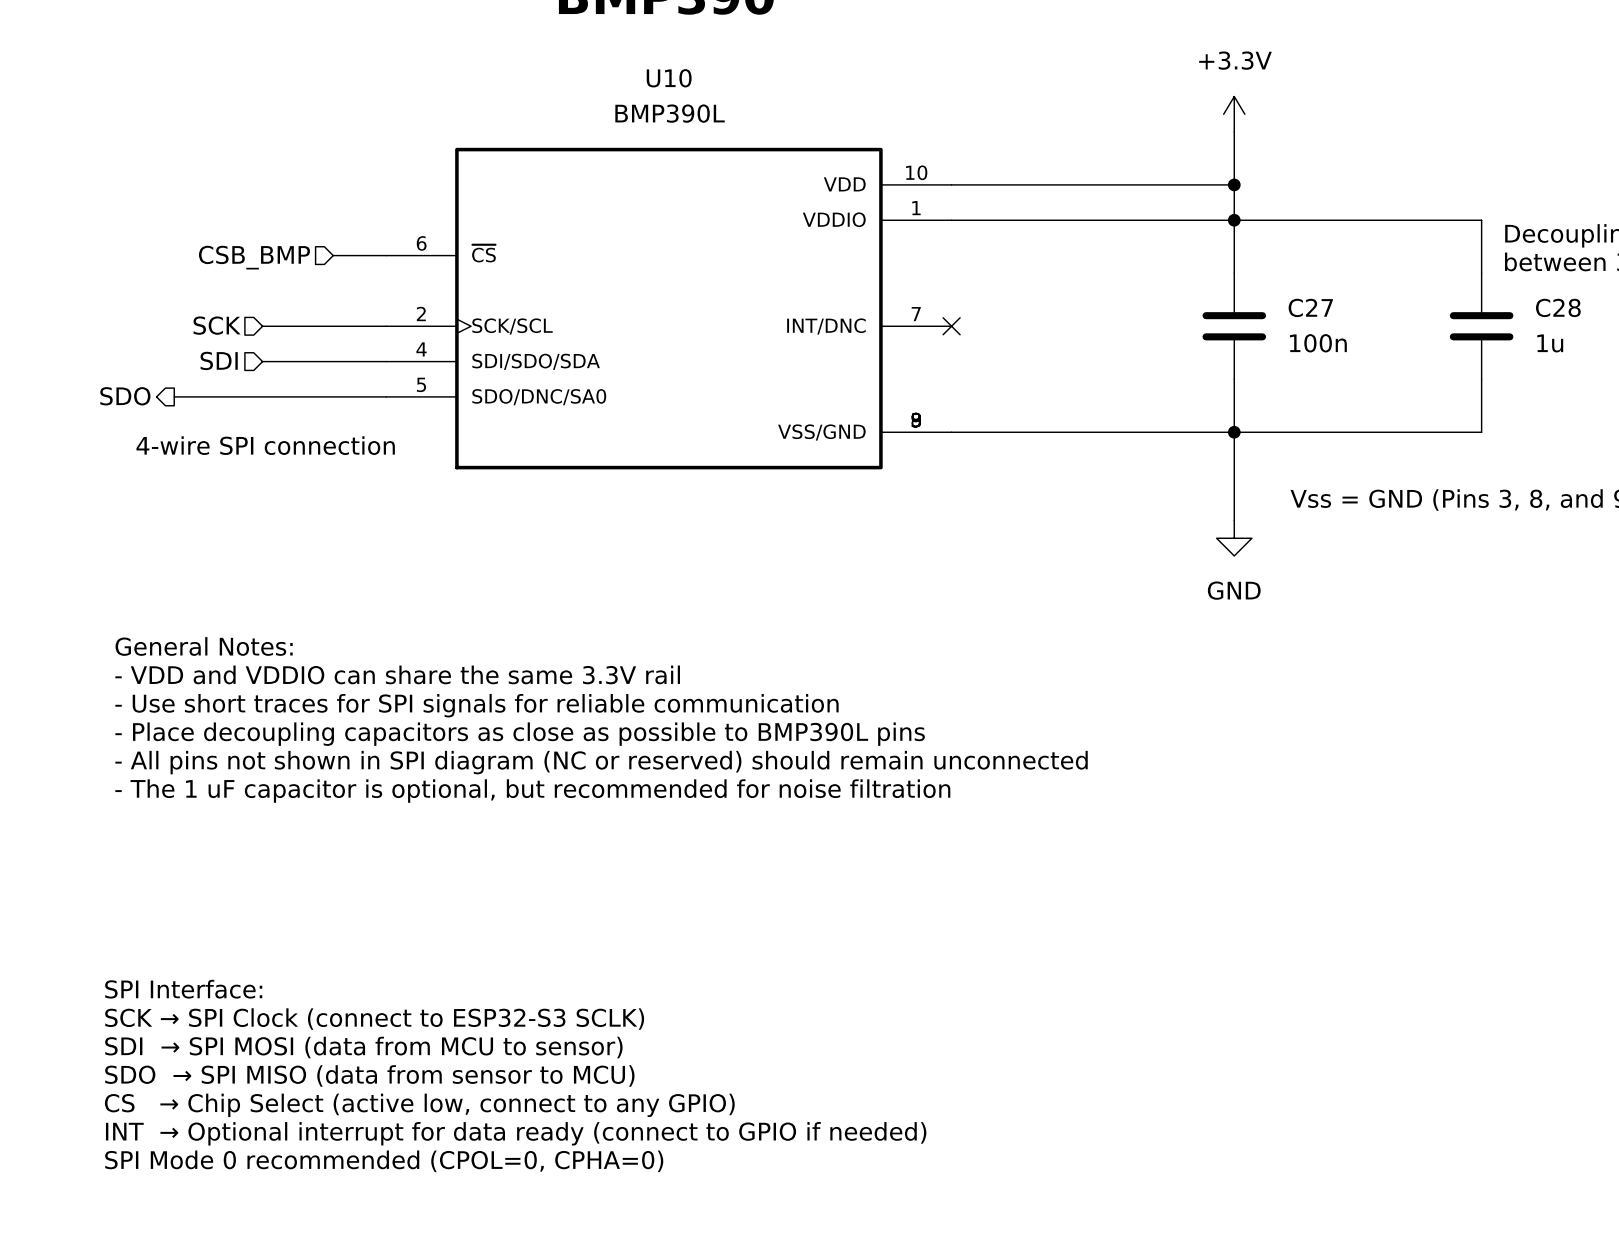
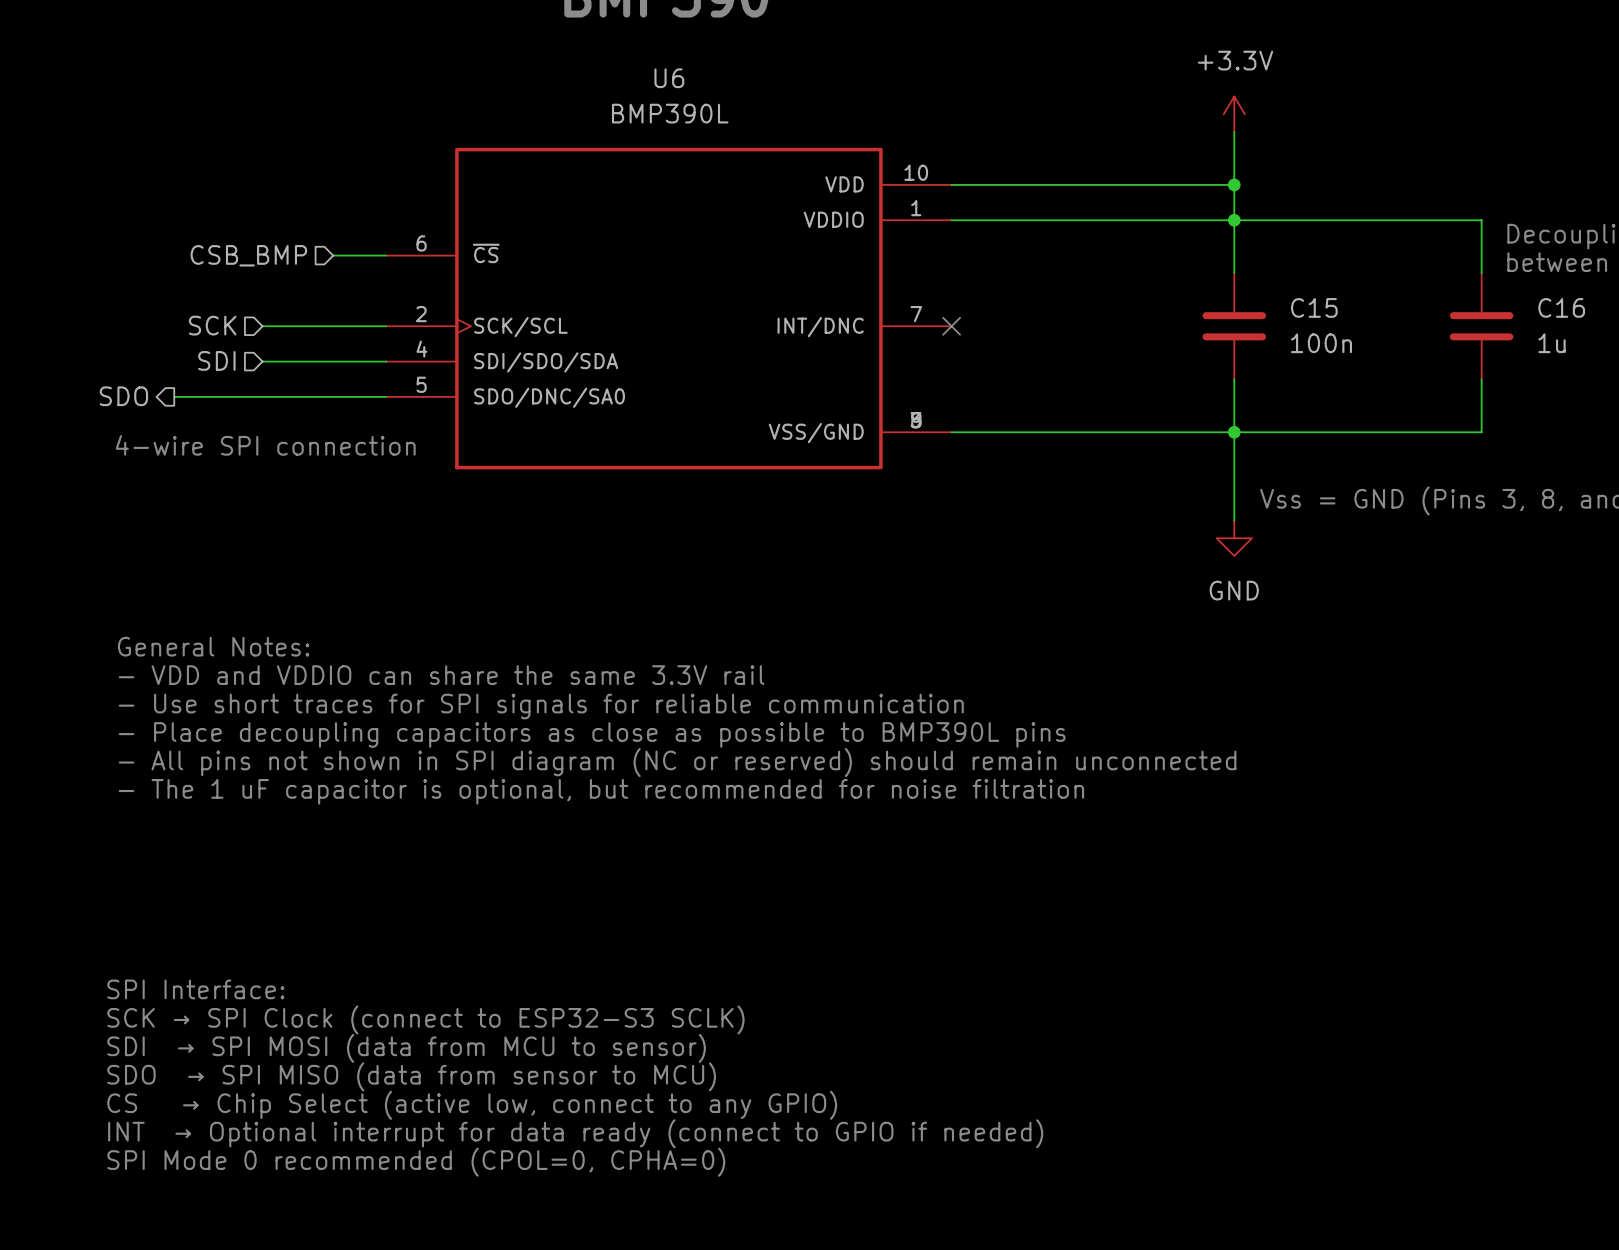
U10 name: U10 (669, 78) -> U6 (669, 78)
C27 name: C27 (1310, 307) -> C15 (1314, 307)
C28 name: C28 (1558, 307) -> C16 (1561, 307)

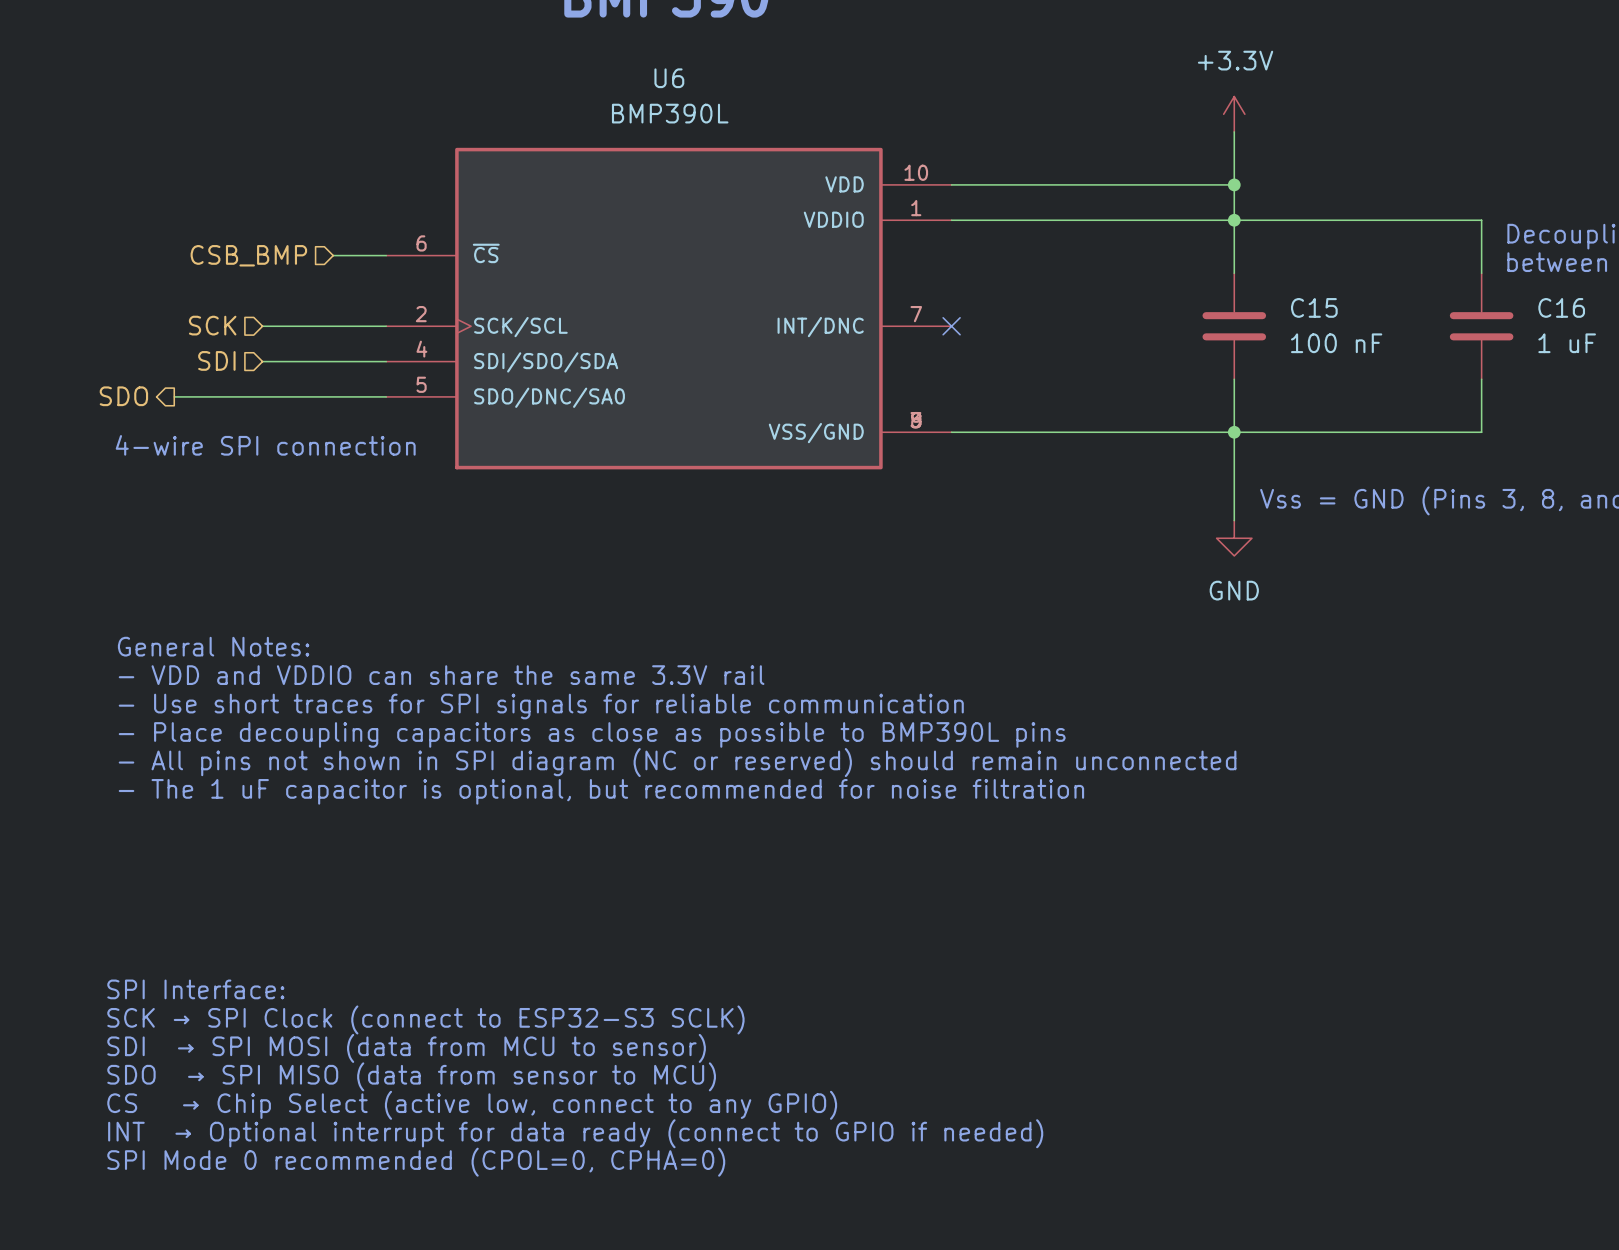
C15 value: 100n (1321, 343) -> 100 nF (1336, 343)
C16 value: 1u (1552, 343) -> 1 uF (1567, 343)

